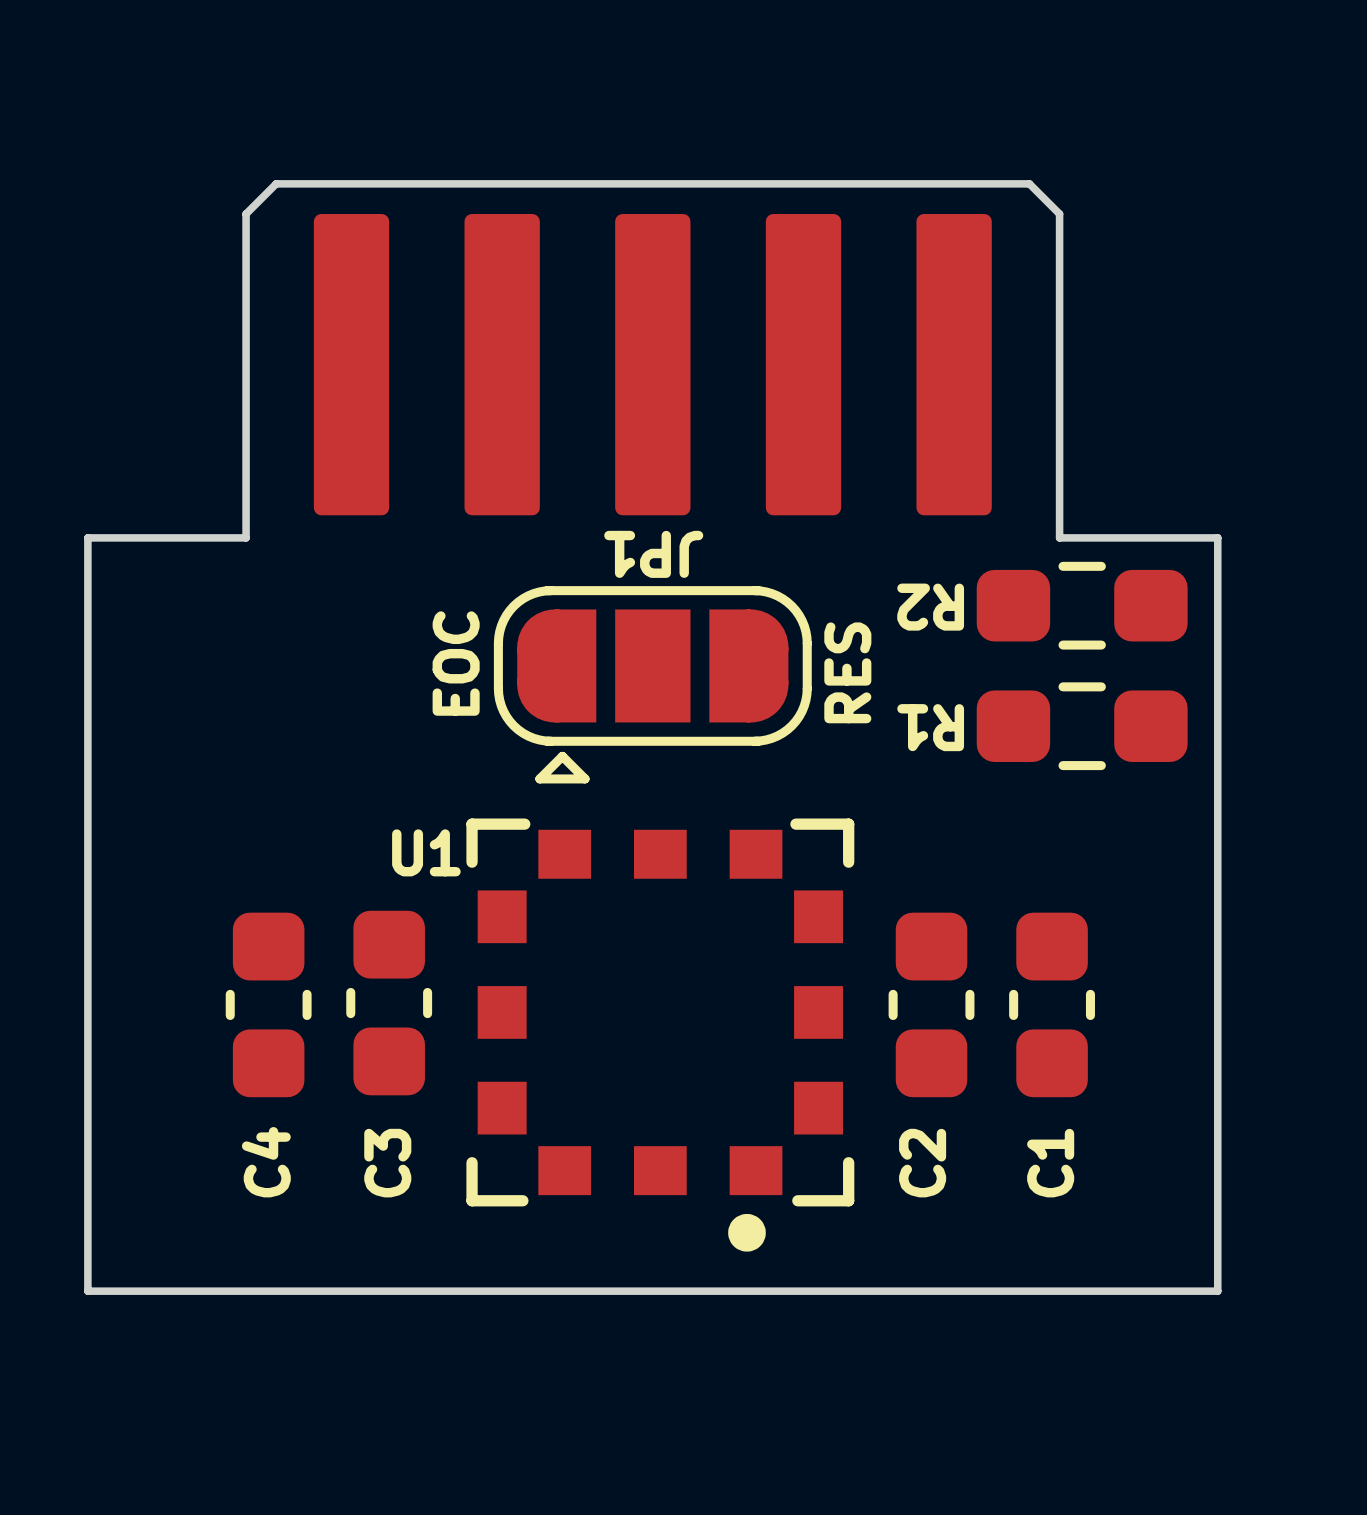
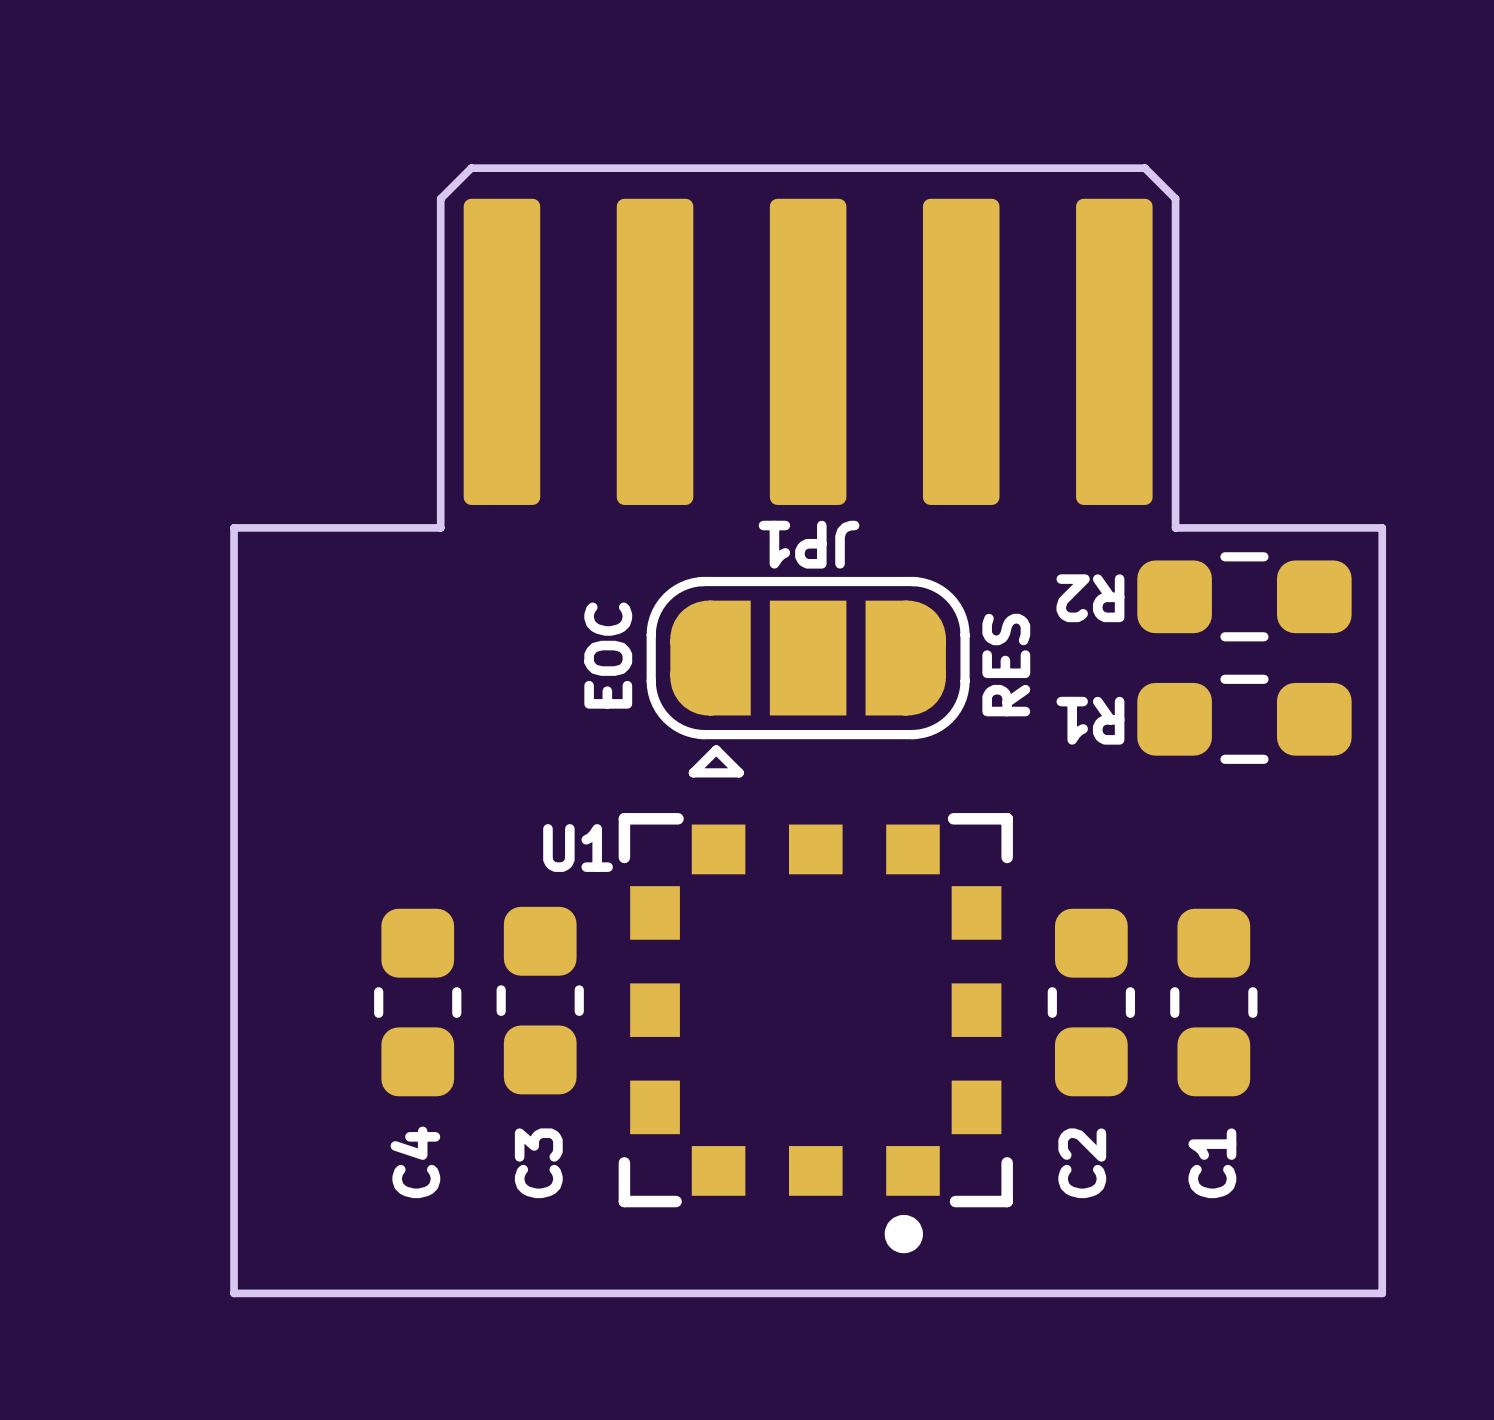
board edge: (321, 183) (276, 183) (246, 214) (246, 537) -> (471, 168) (440, 198) (440, 527) (394, 527)
board edge: (984, 183) (1029, 183) (1059, 214) (1059, 537) -> (1144, 168) (1175, 198) (1175, 527) (1221, 527)

